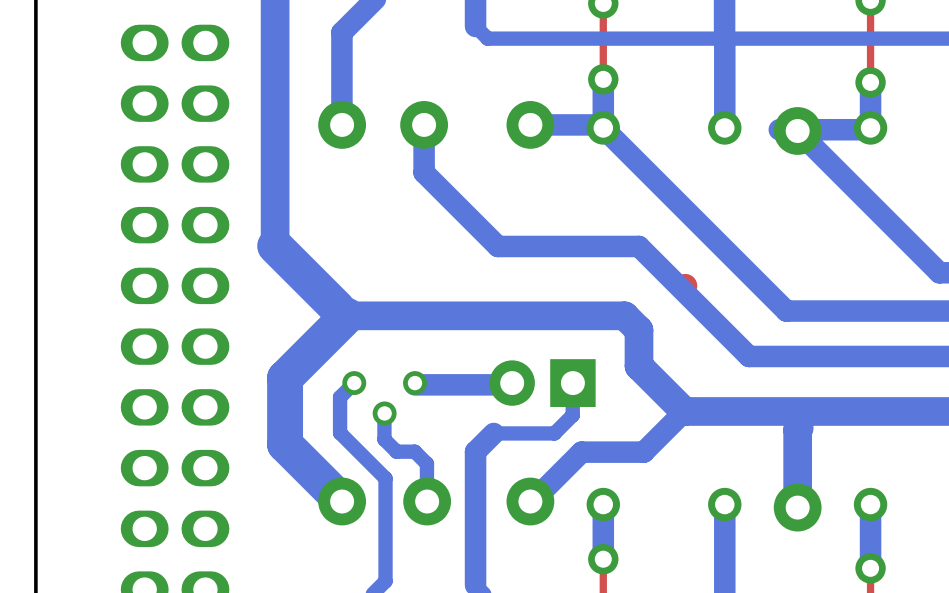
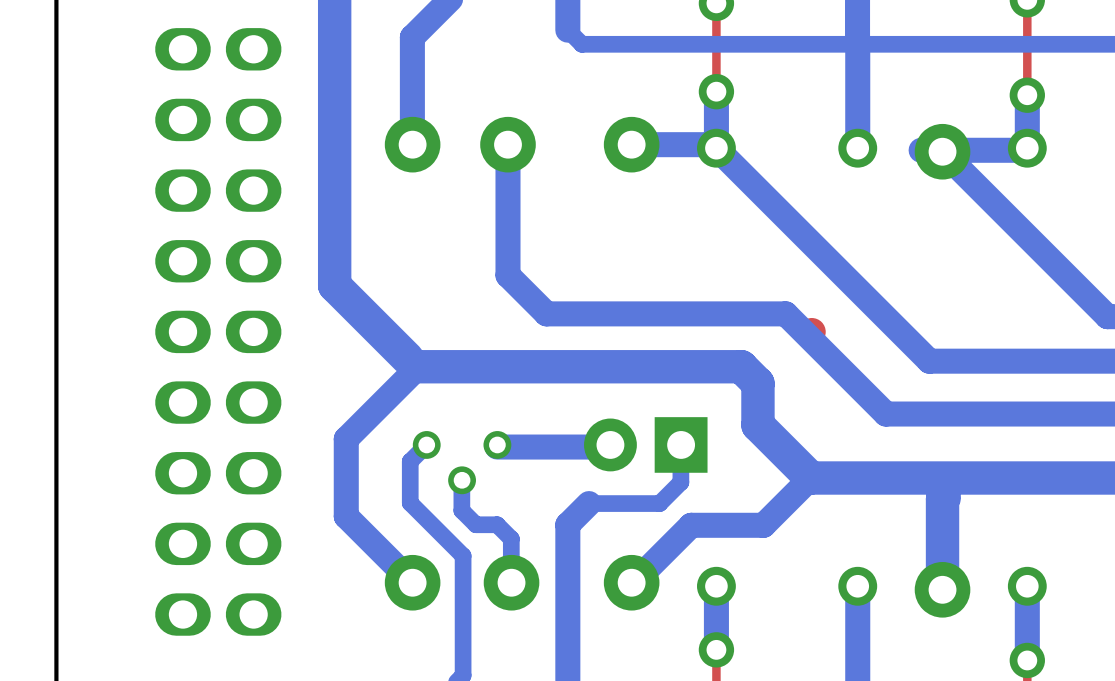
bottom track: (424, 172) (497, 246) (639, 246) (662, 270) -> (507, 200) (507, 275) (546, 313) (785, 313)
bottom track width: thick (275, 246) (337, 308) -> thin (334, 285) (407, 358)
bottom track width: thick (347, 315) (285, 378) (285, 444) (342, 501) -> thin (418, 366) (346, 439) (346, 516) (412, 582)

